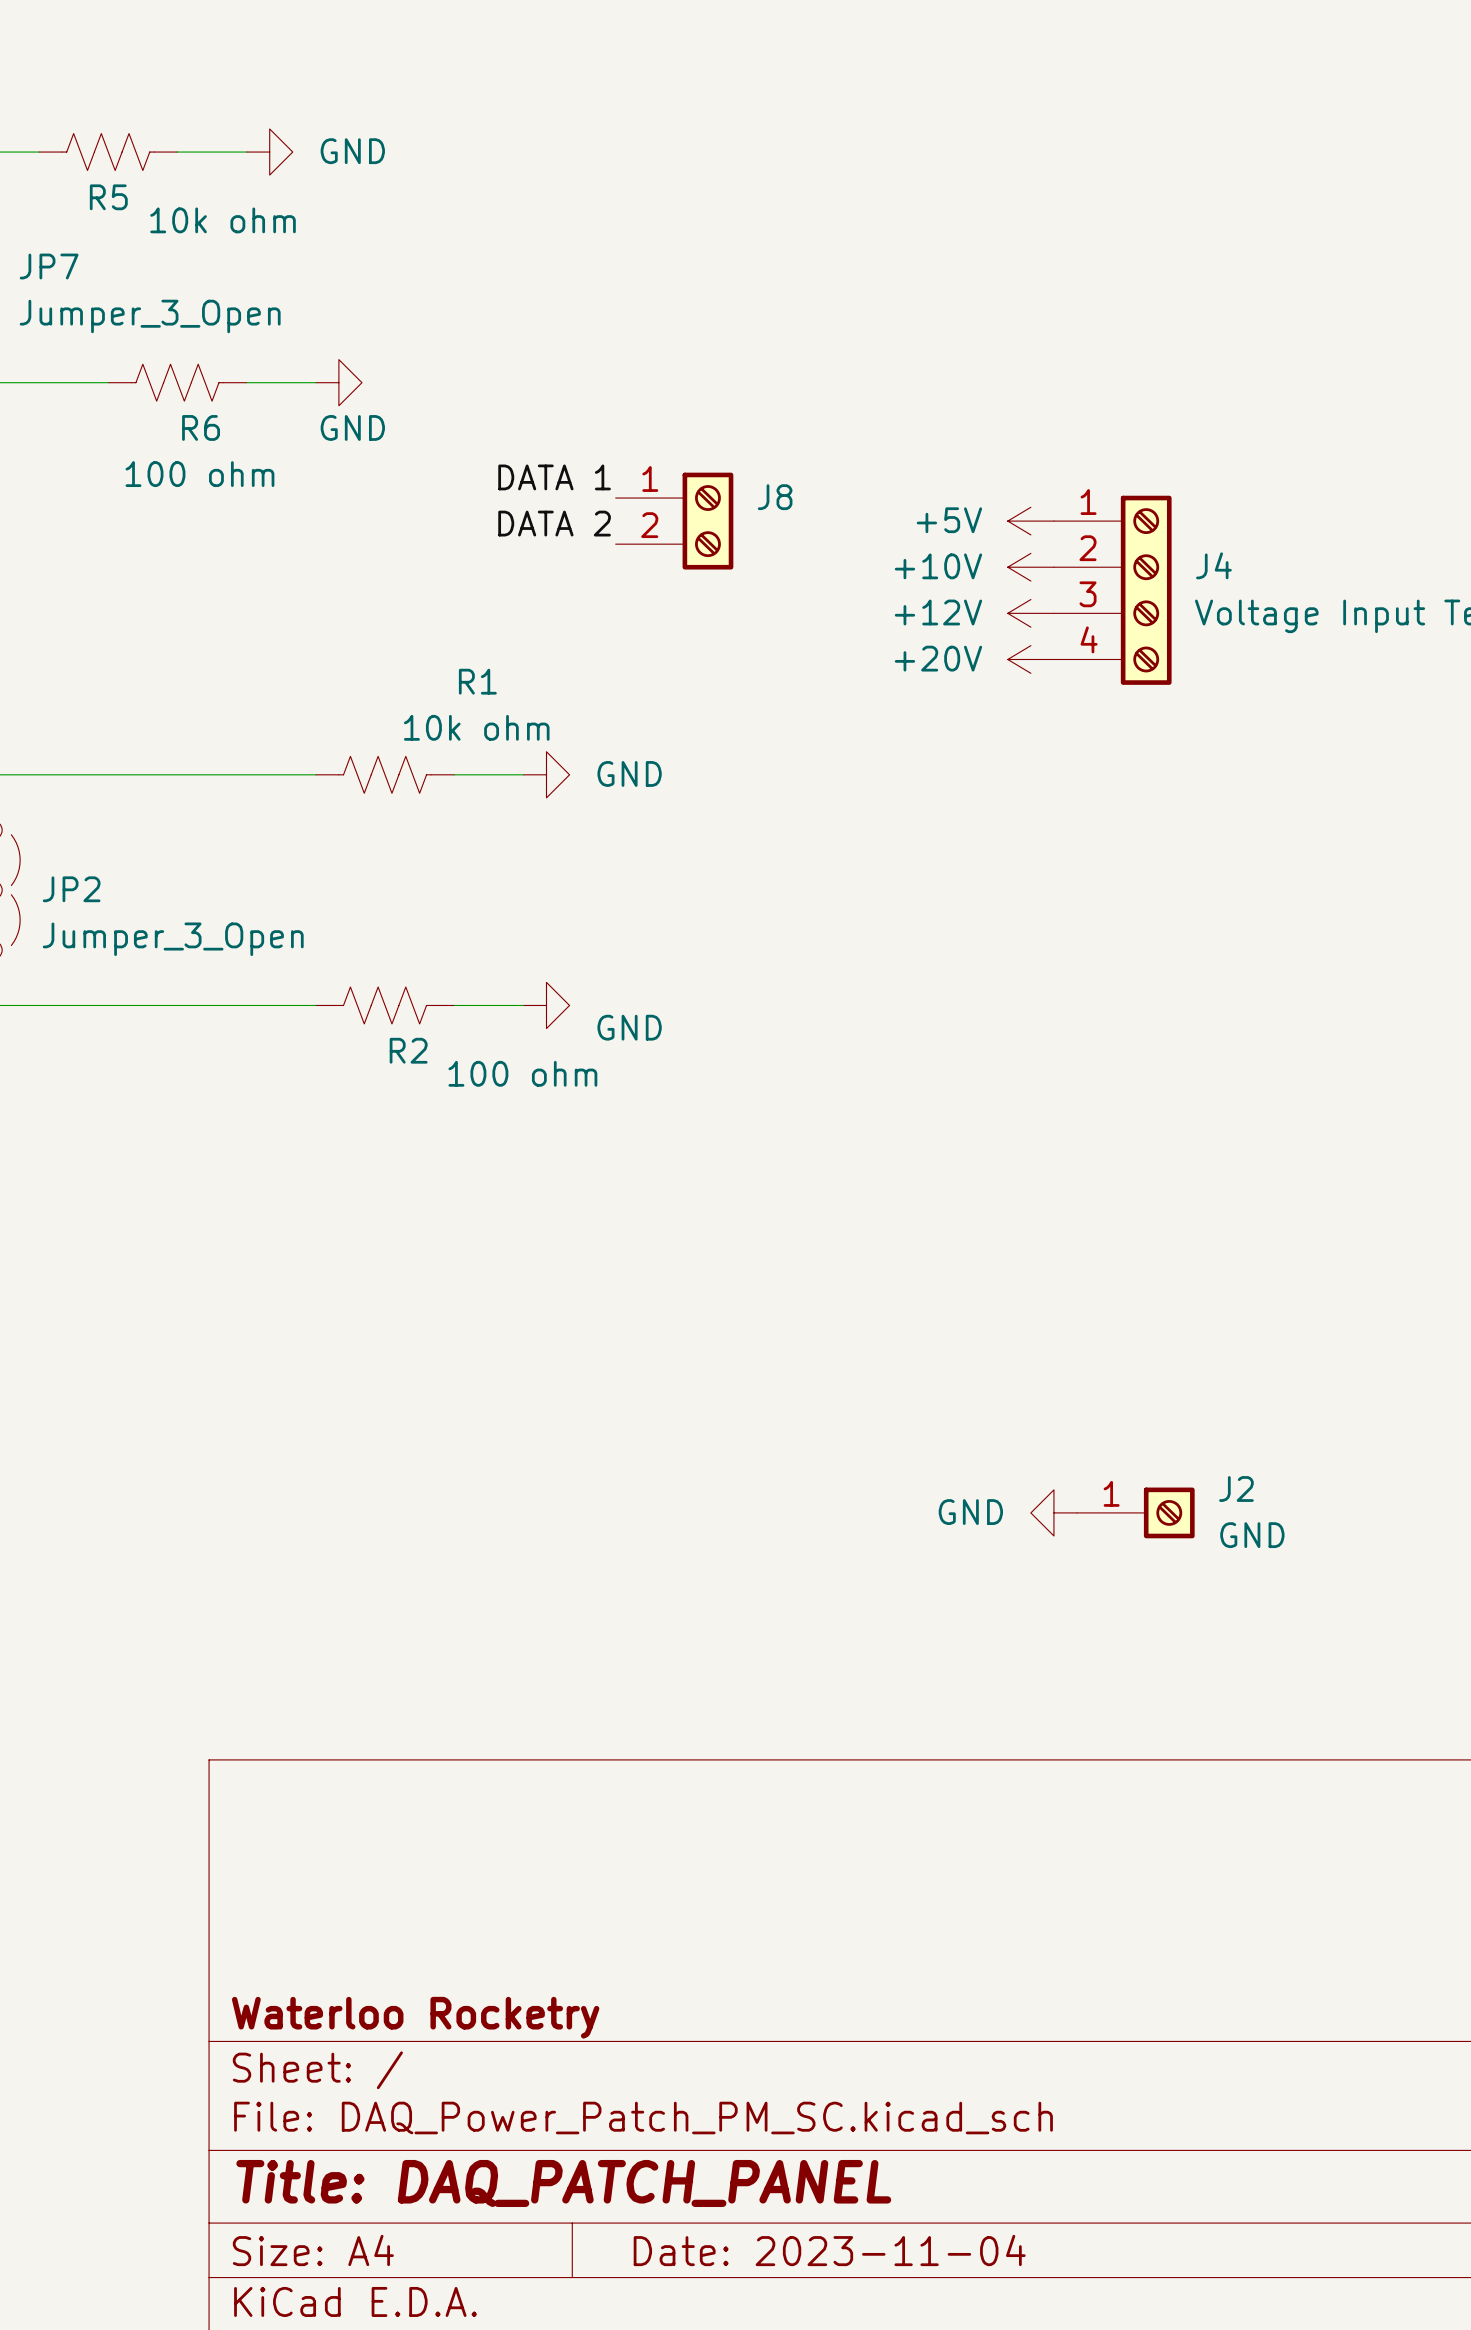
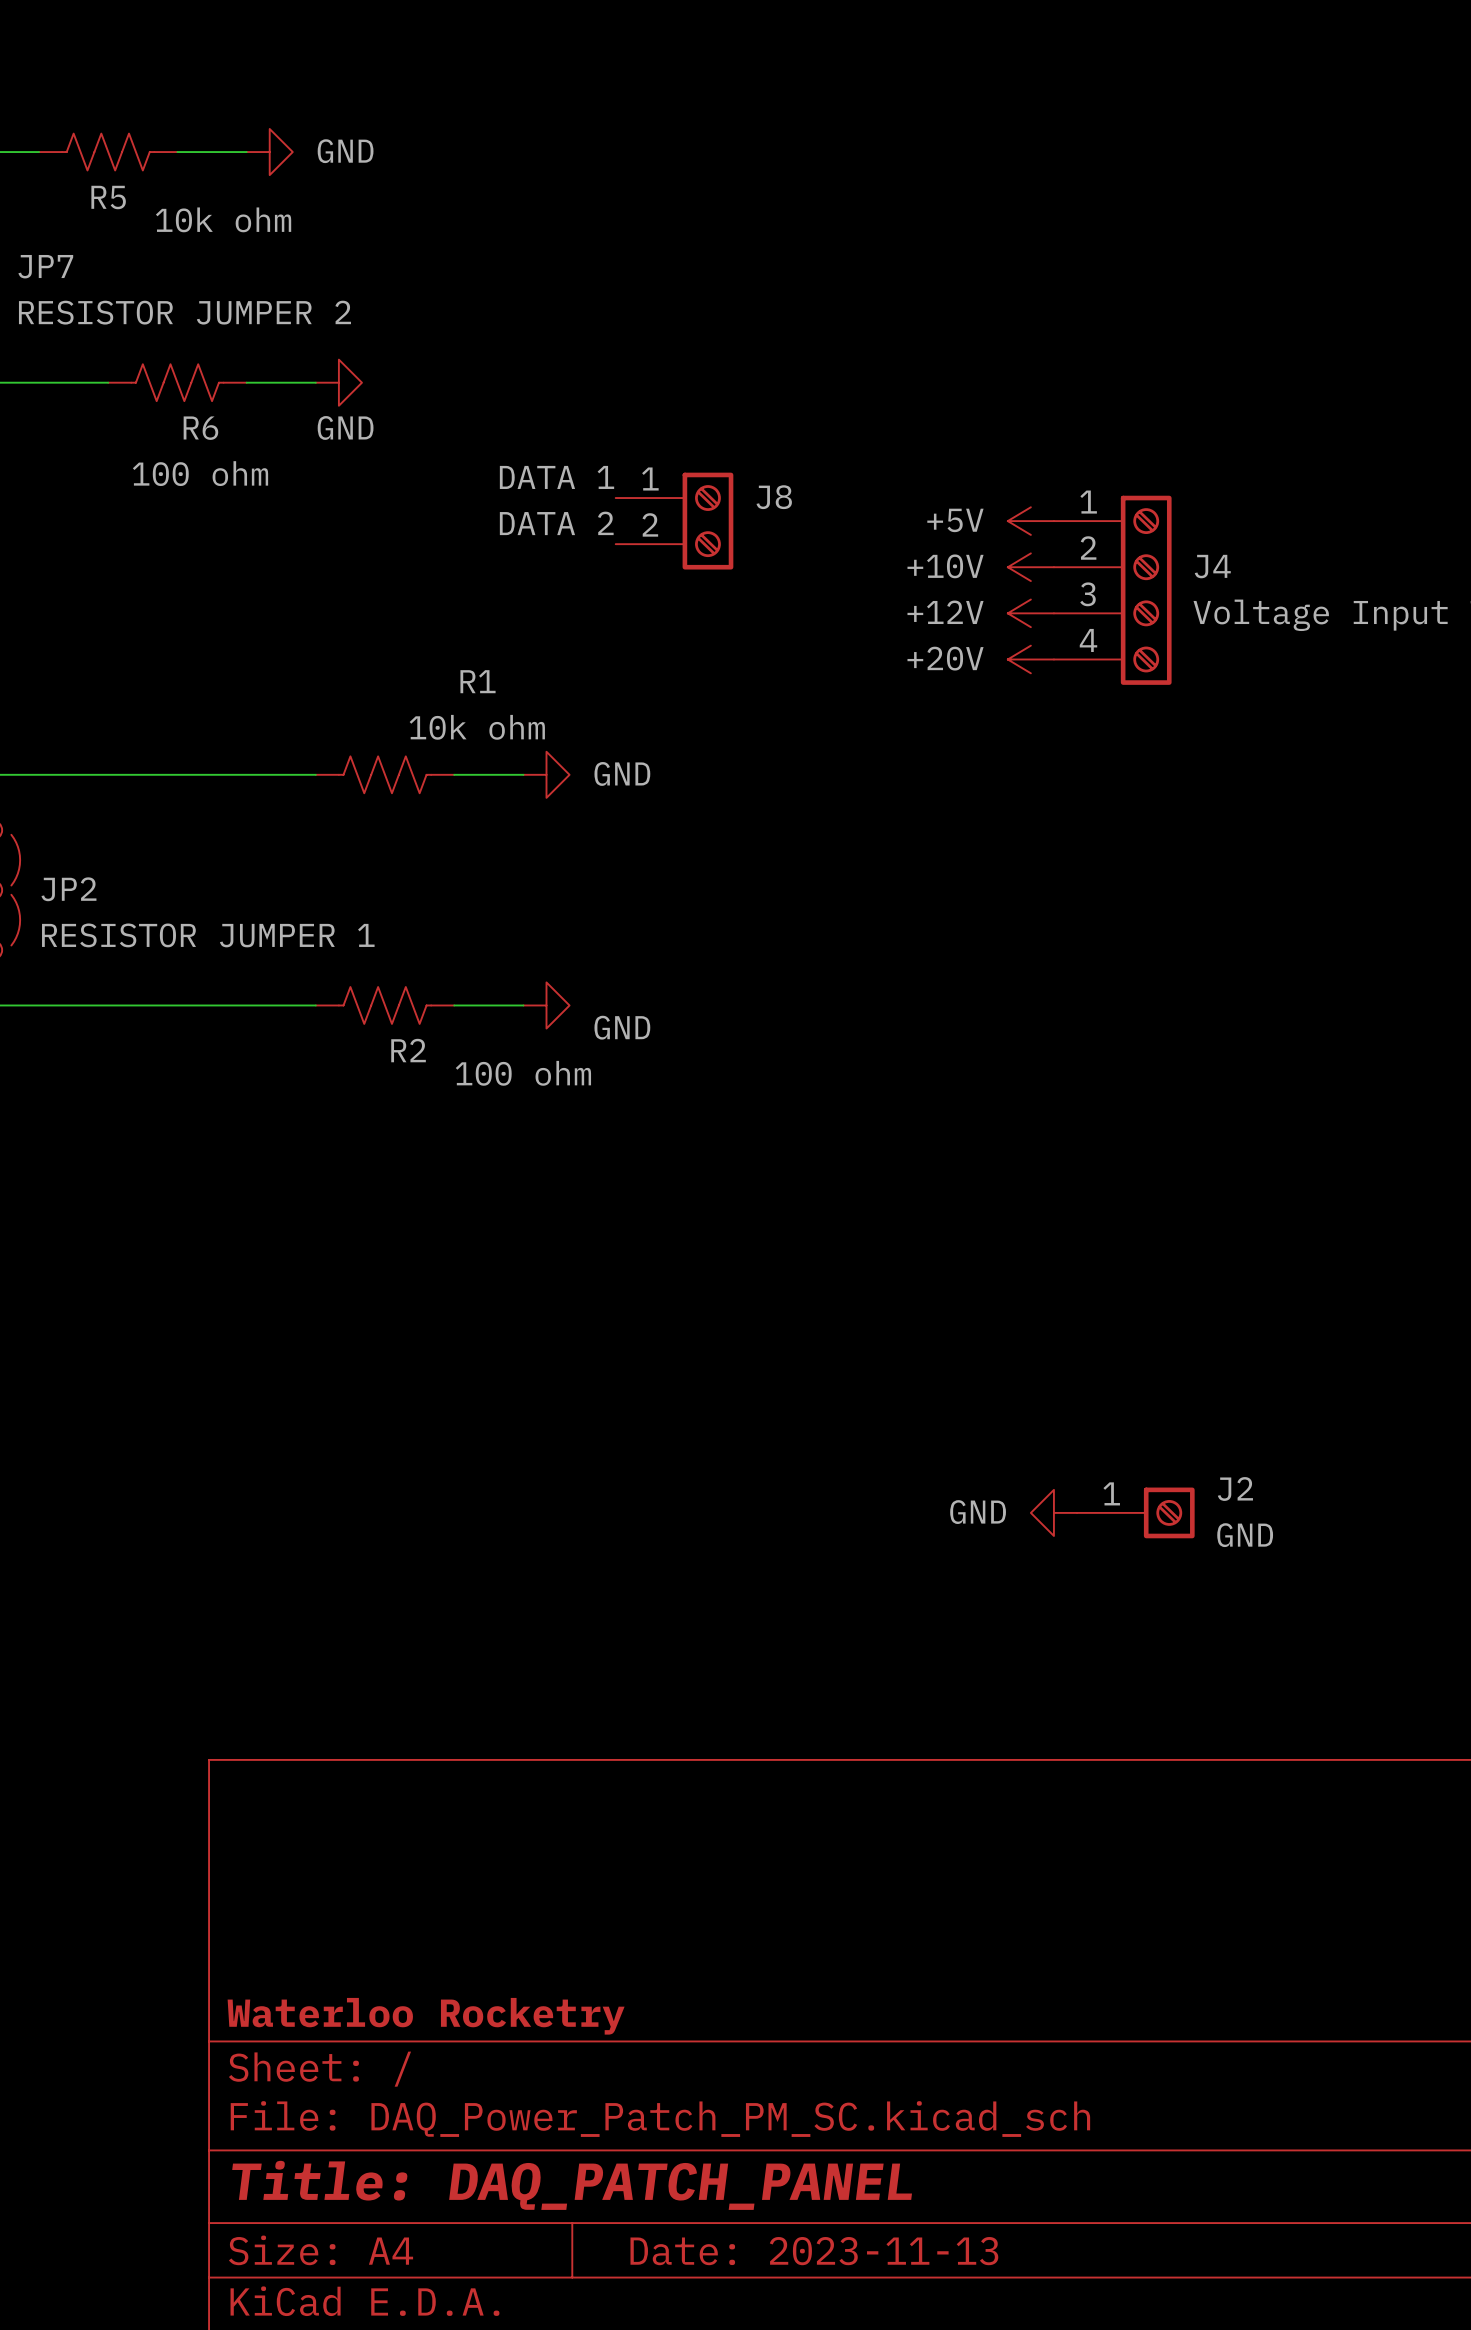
JP7 value: Jumper_3_Open (150, 316) -> RESISTOR JUMPER 2 (184, 312)
JP2 value: Jumper_3_Open (173, 939) -> RESISTOR JUMPER 1 (208, 935)
title block: Date: 2023-11-04 (829, 2250) -> Date: 2023-11-13 (814, 2251)

